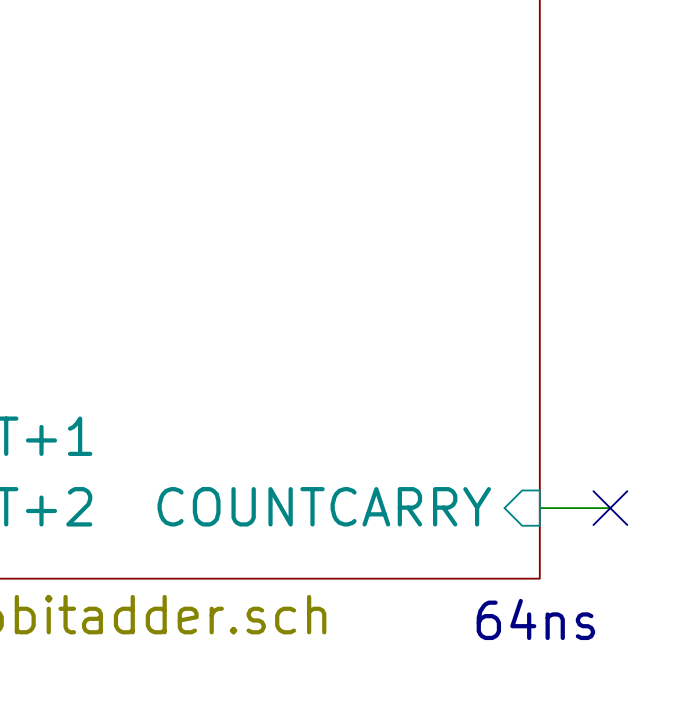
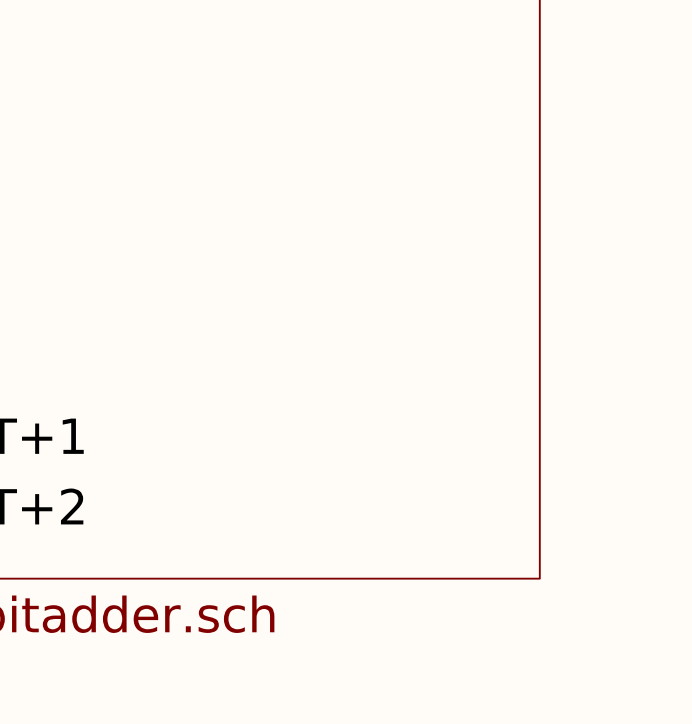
sheet pin: COUNTCARRY (324, 506) -> none
wire: (539, 508) (610, 508) -> none
no-connect mark: (610, 508) -> none
text: 64ns (535, 619) -> none

